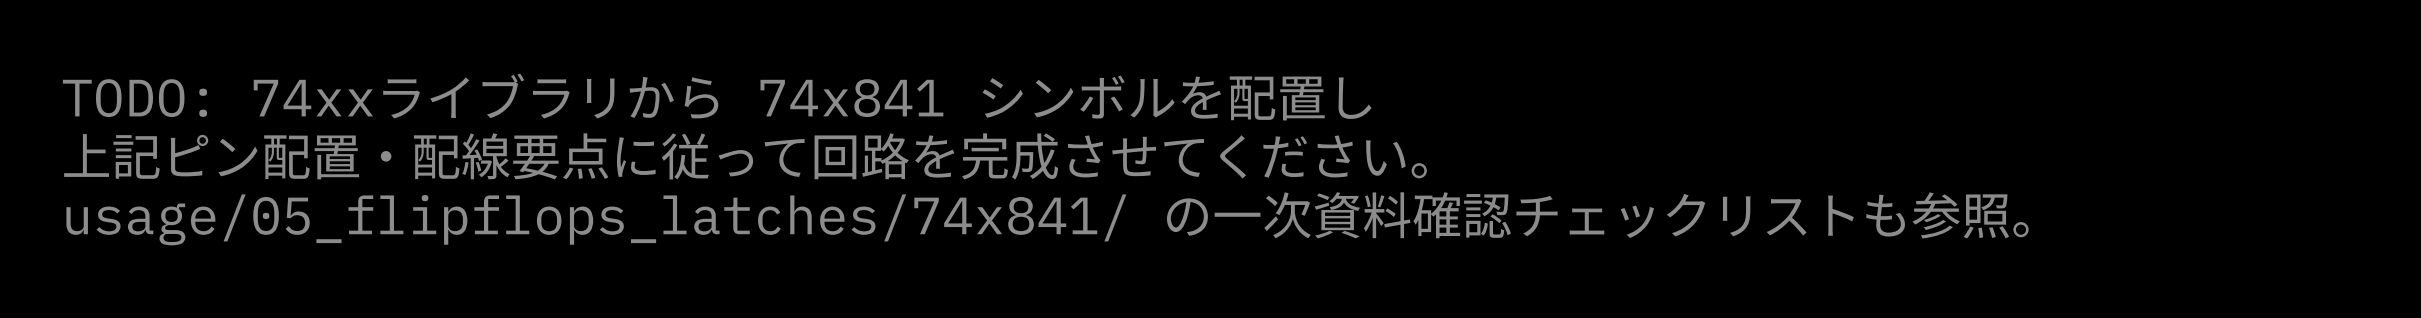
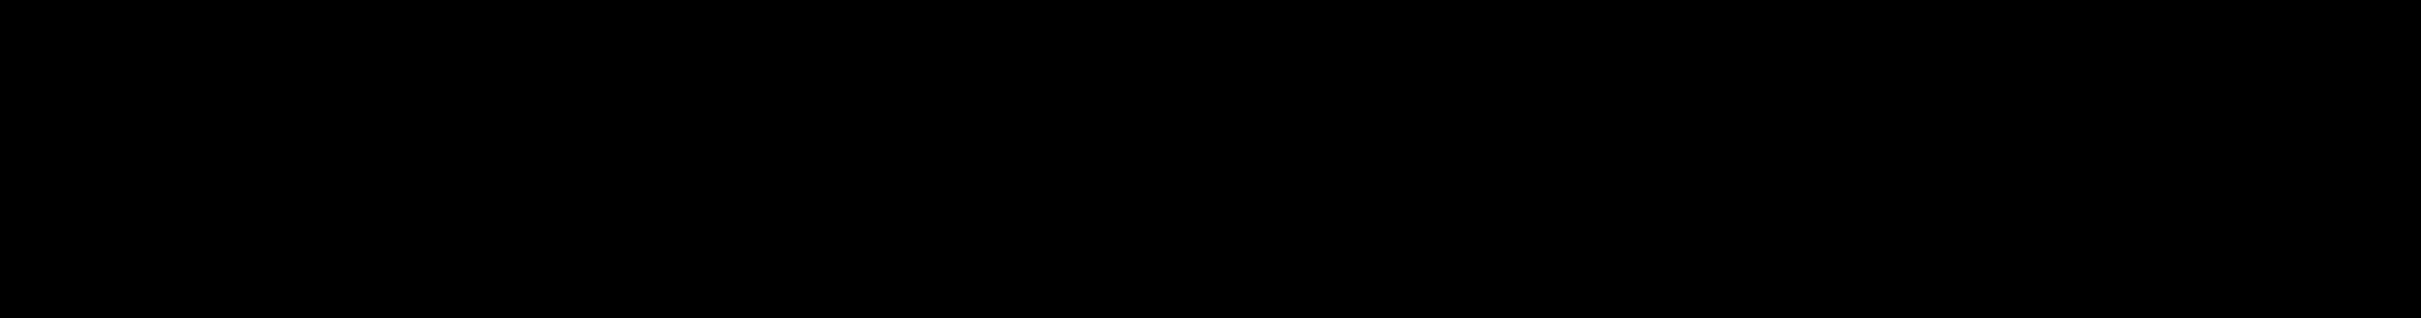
text: TODO: 74xxライブラリから 74x841 シンボルを配置し (717, 97) -> none
text: 上記ピン配置・配線要点に従って回路を完成させてください。 (745, 156) -> none
text: usage/05_flipflops_latches/74x841/ の一次資料確認チェックリストも参照。 (1047, 218) -> none

